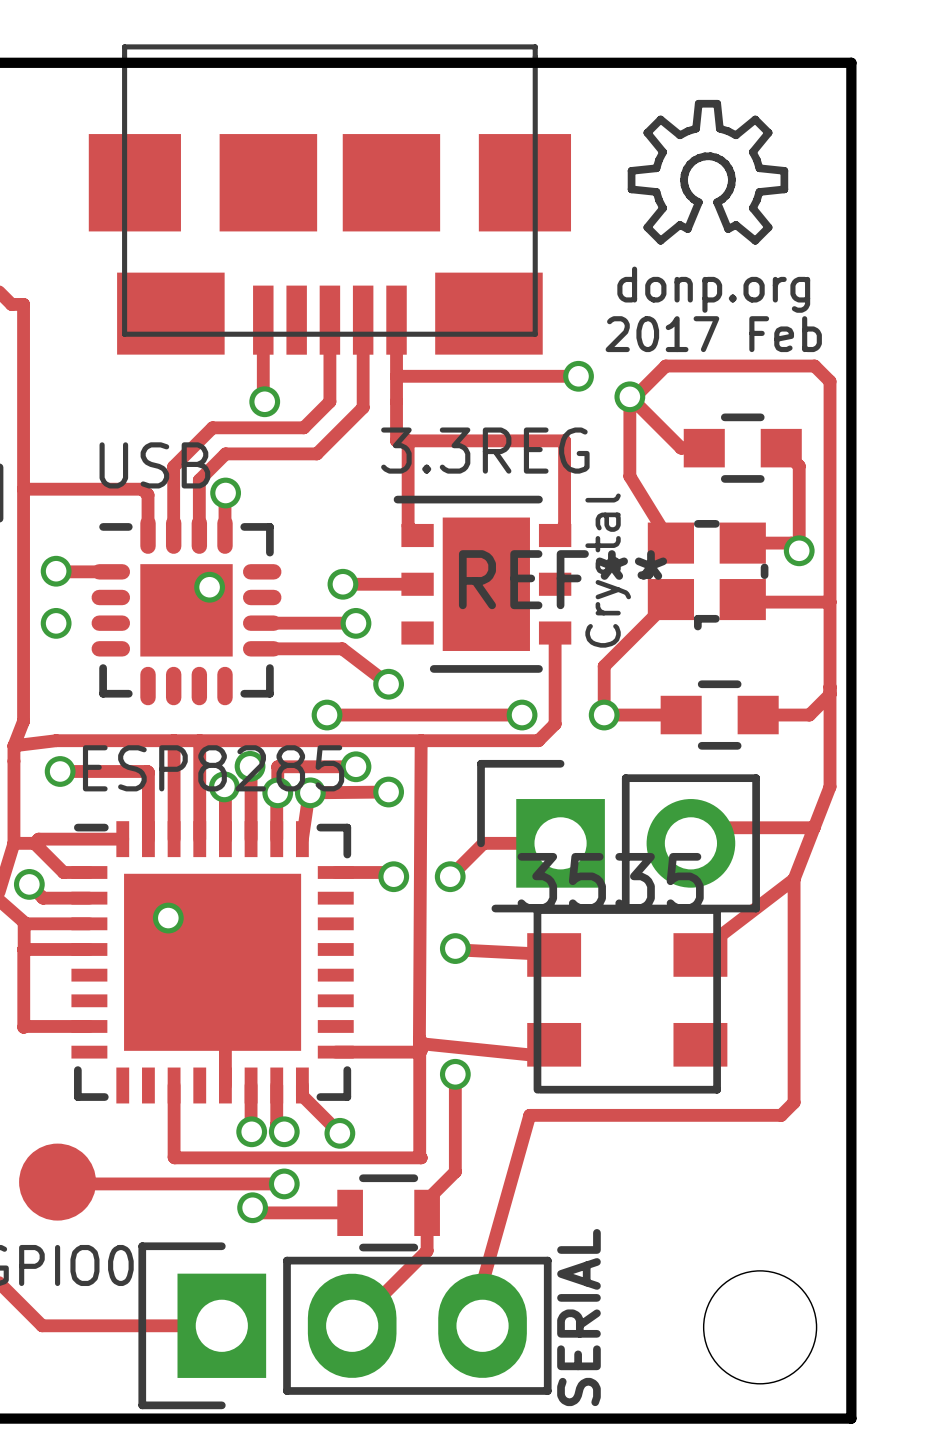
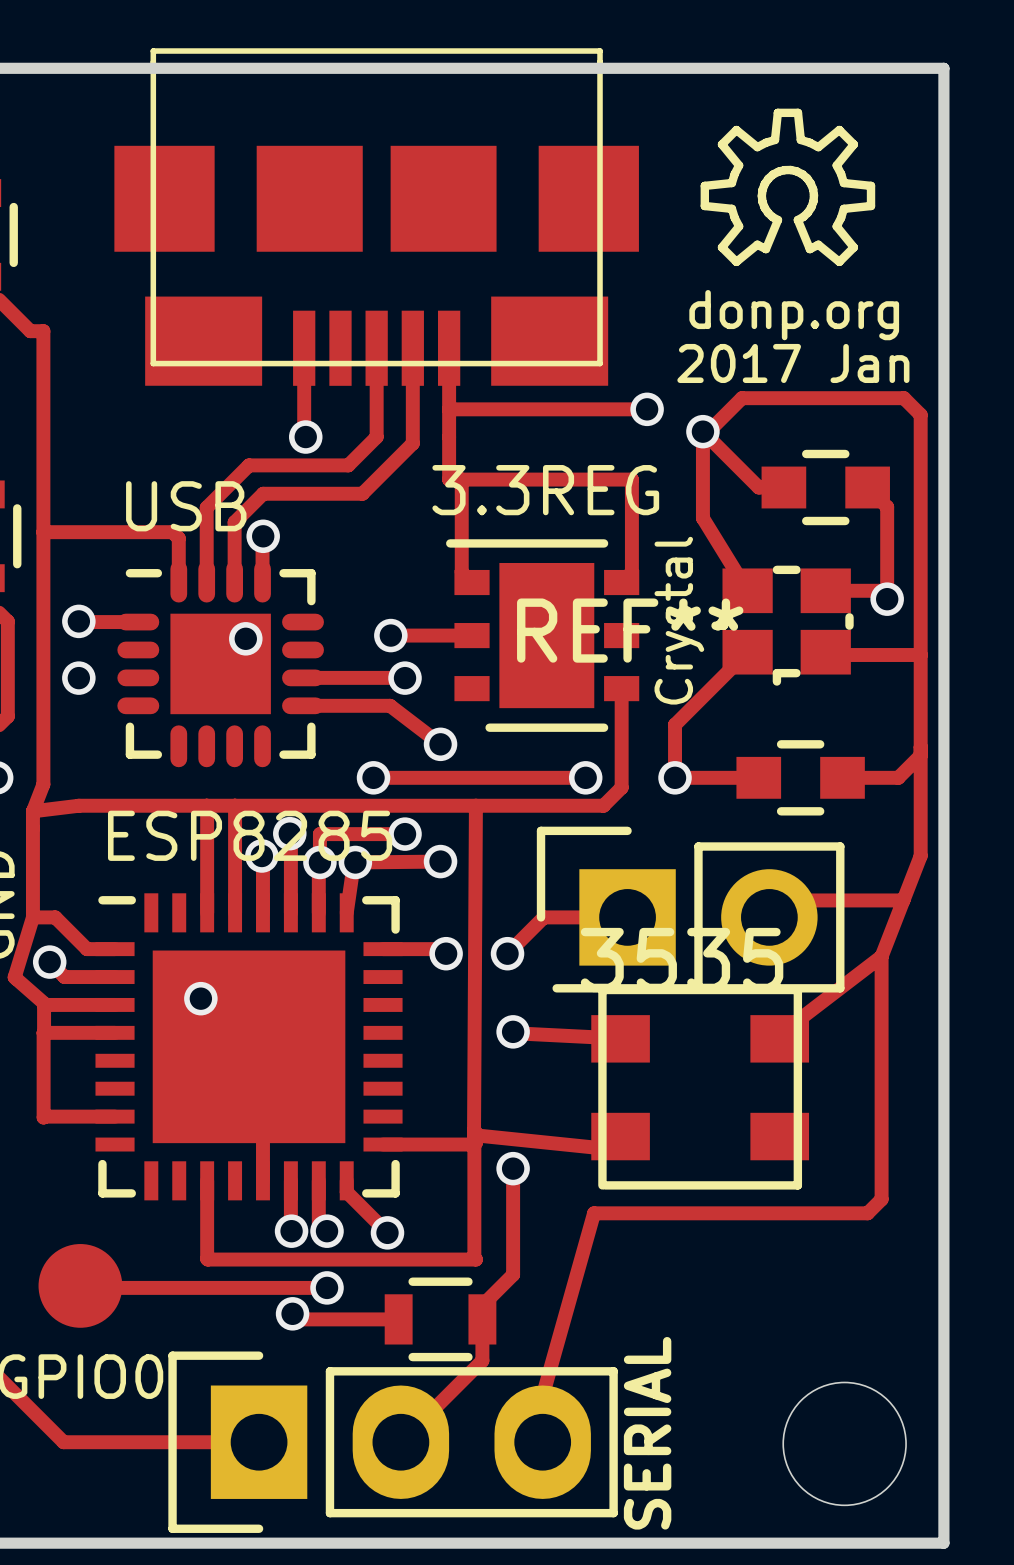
text: 2017 Feb (713, 334) -> 2017 Jan (793, 363)
track: (60, 771) (147, 771) (148, 839) -> none
via: (60, 771) -> none
track: (122, 839) (38, 839) (34, 843) -> none

